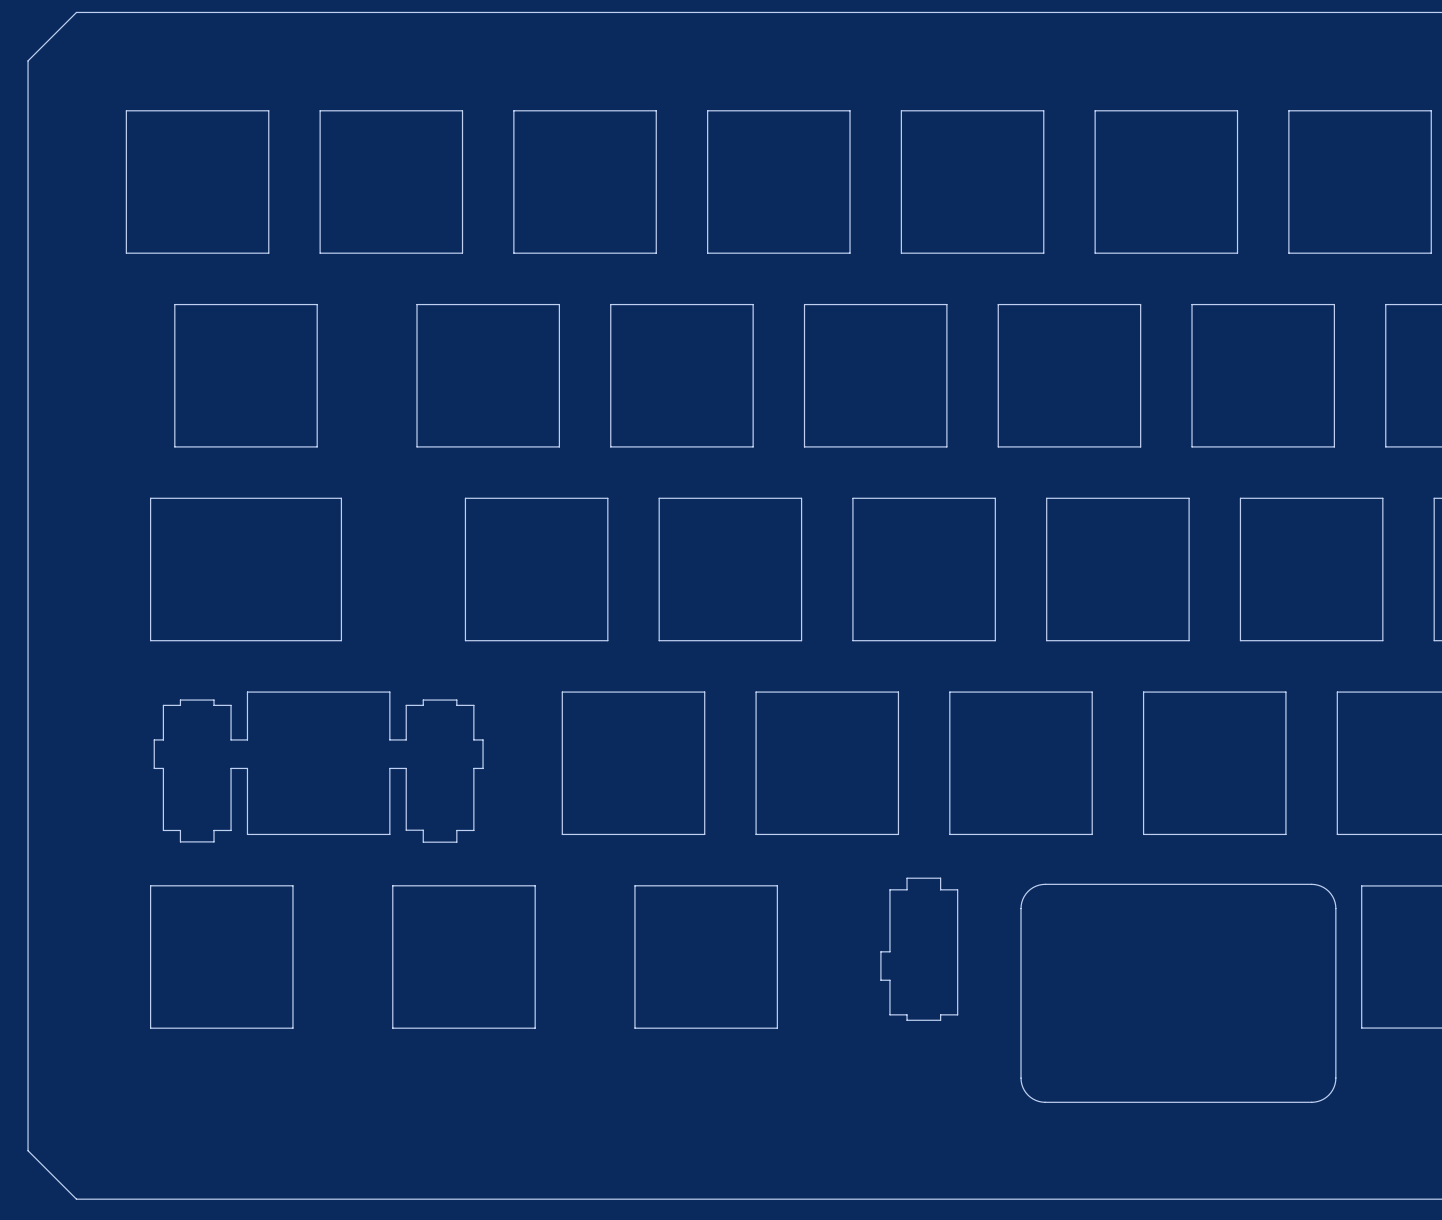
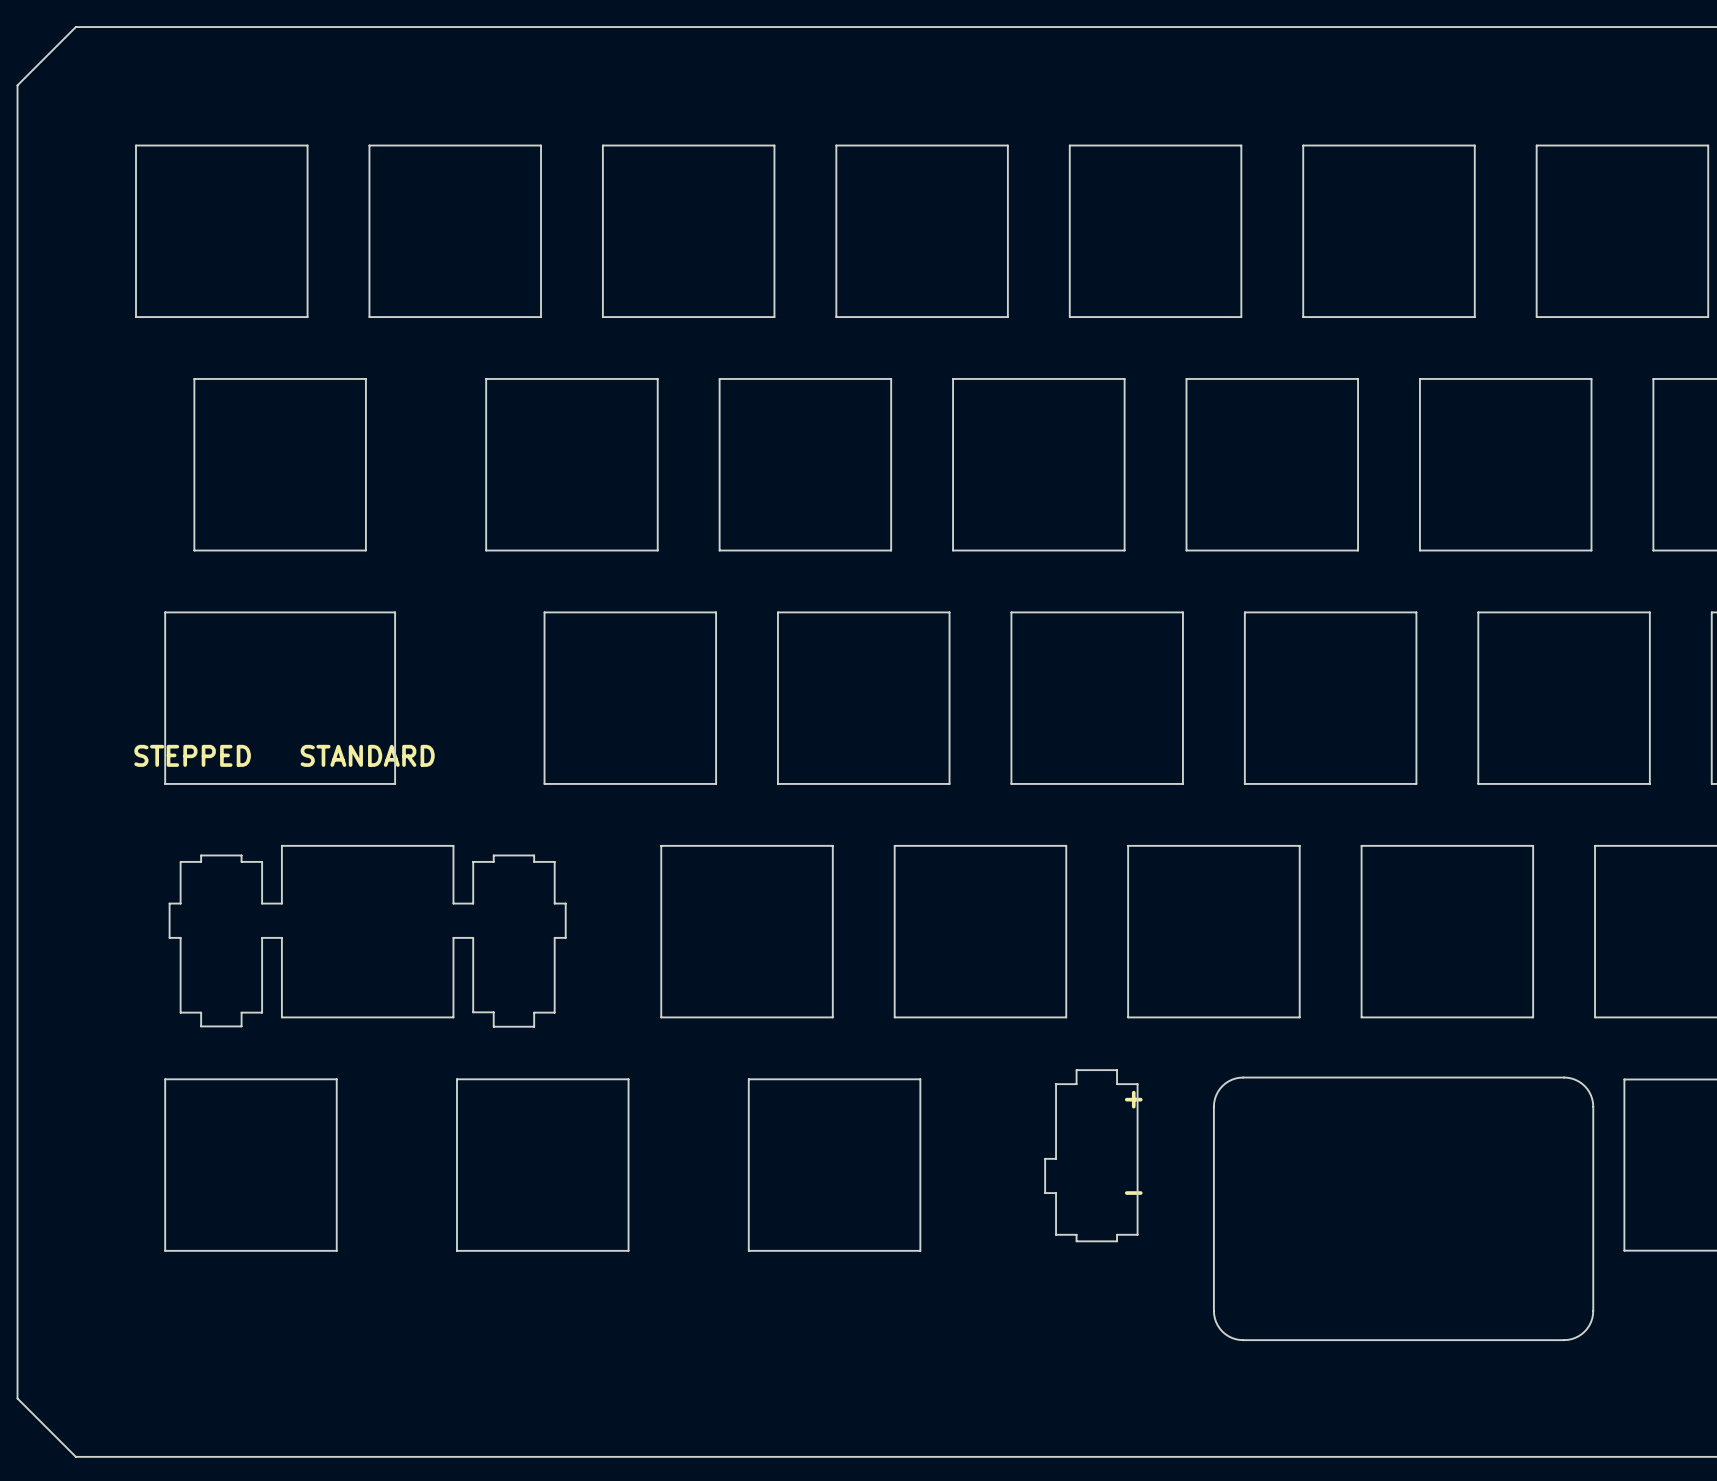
text: none -> STEPPED (192, 755)
text: none -> STANDARD (367, 755)
text: none -> + (1133, 1099)
text: none -> - (1133, 1193)

